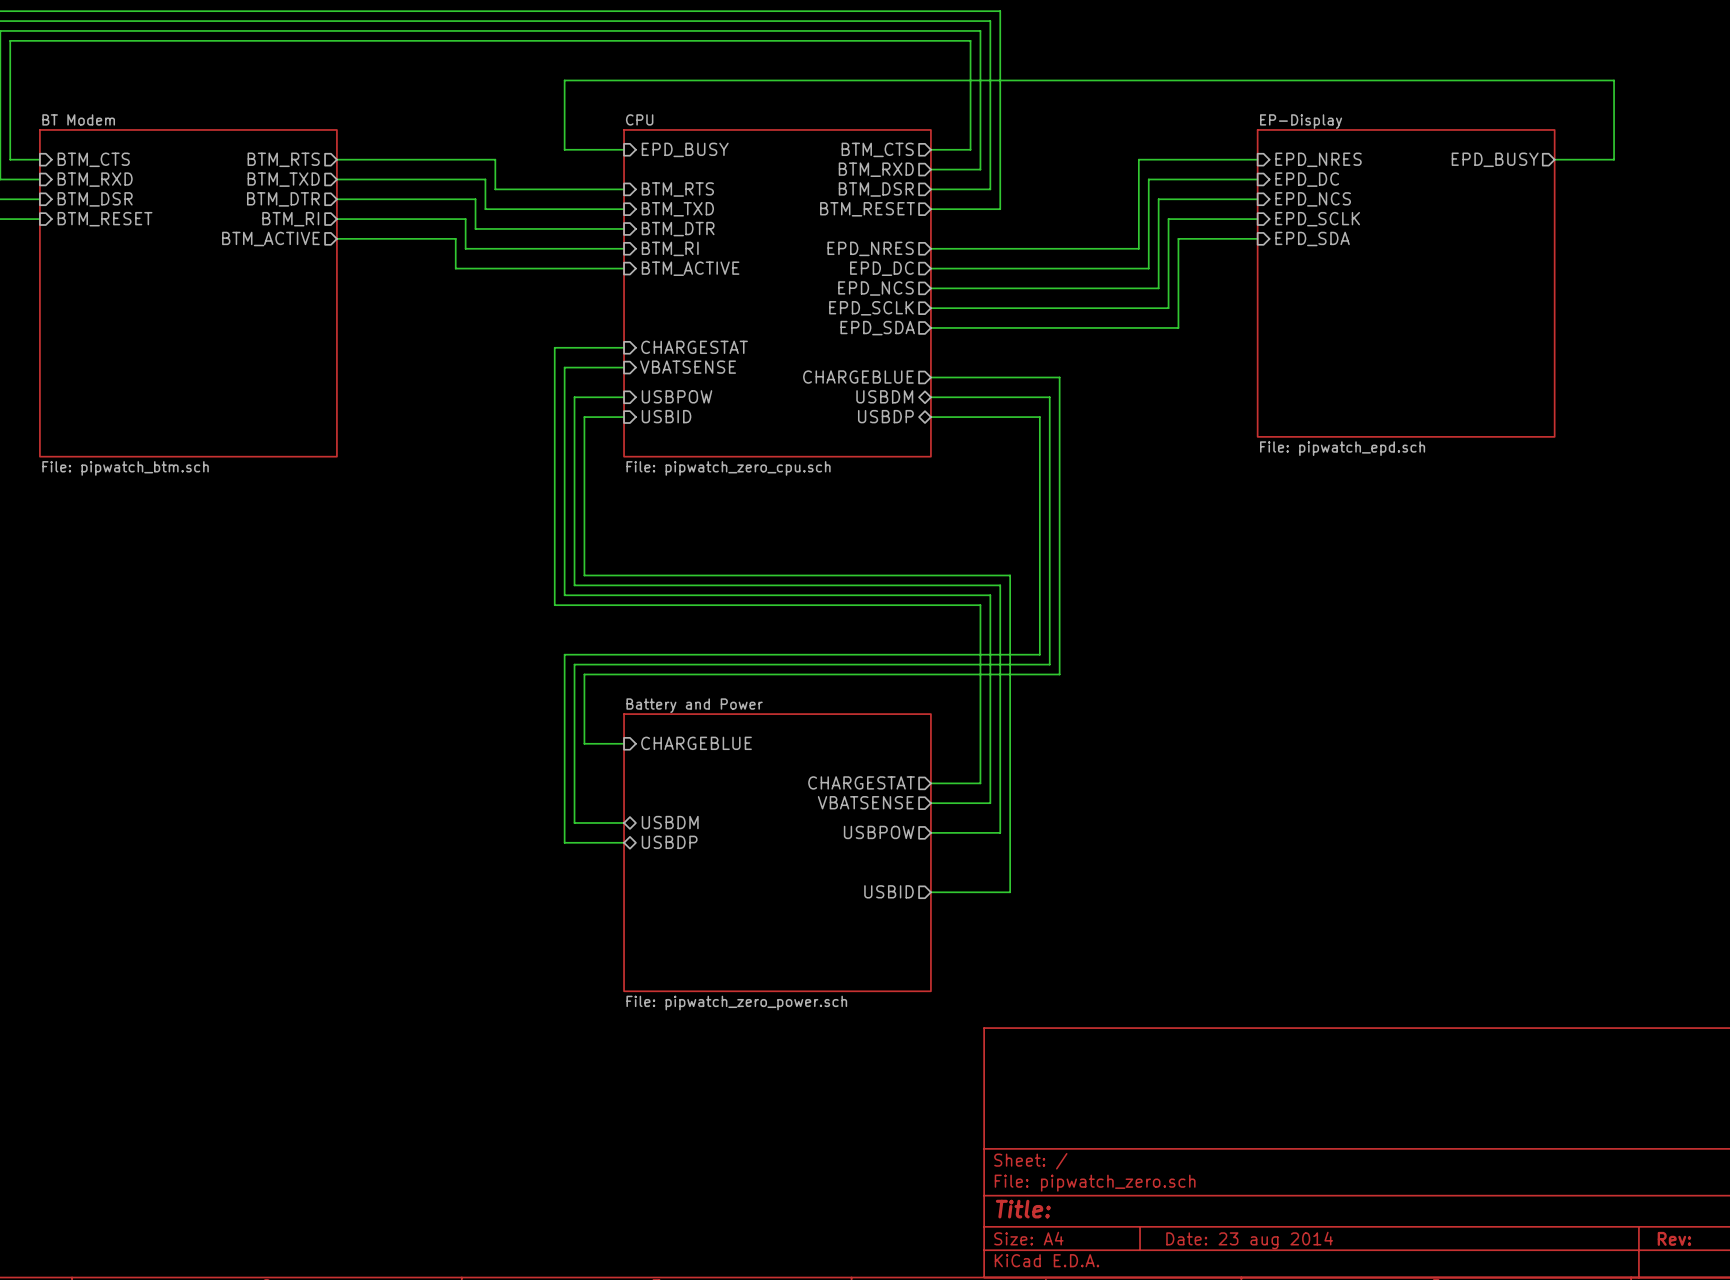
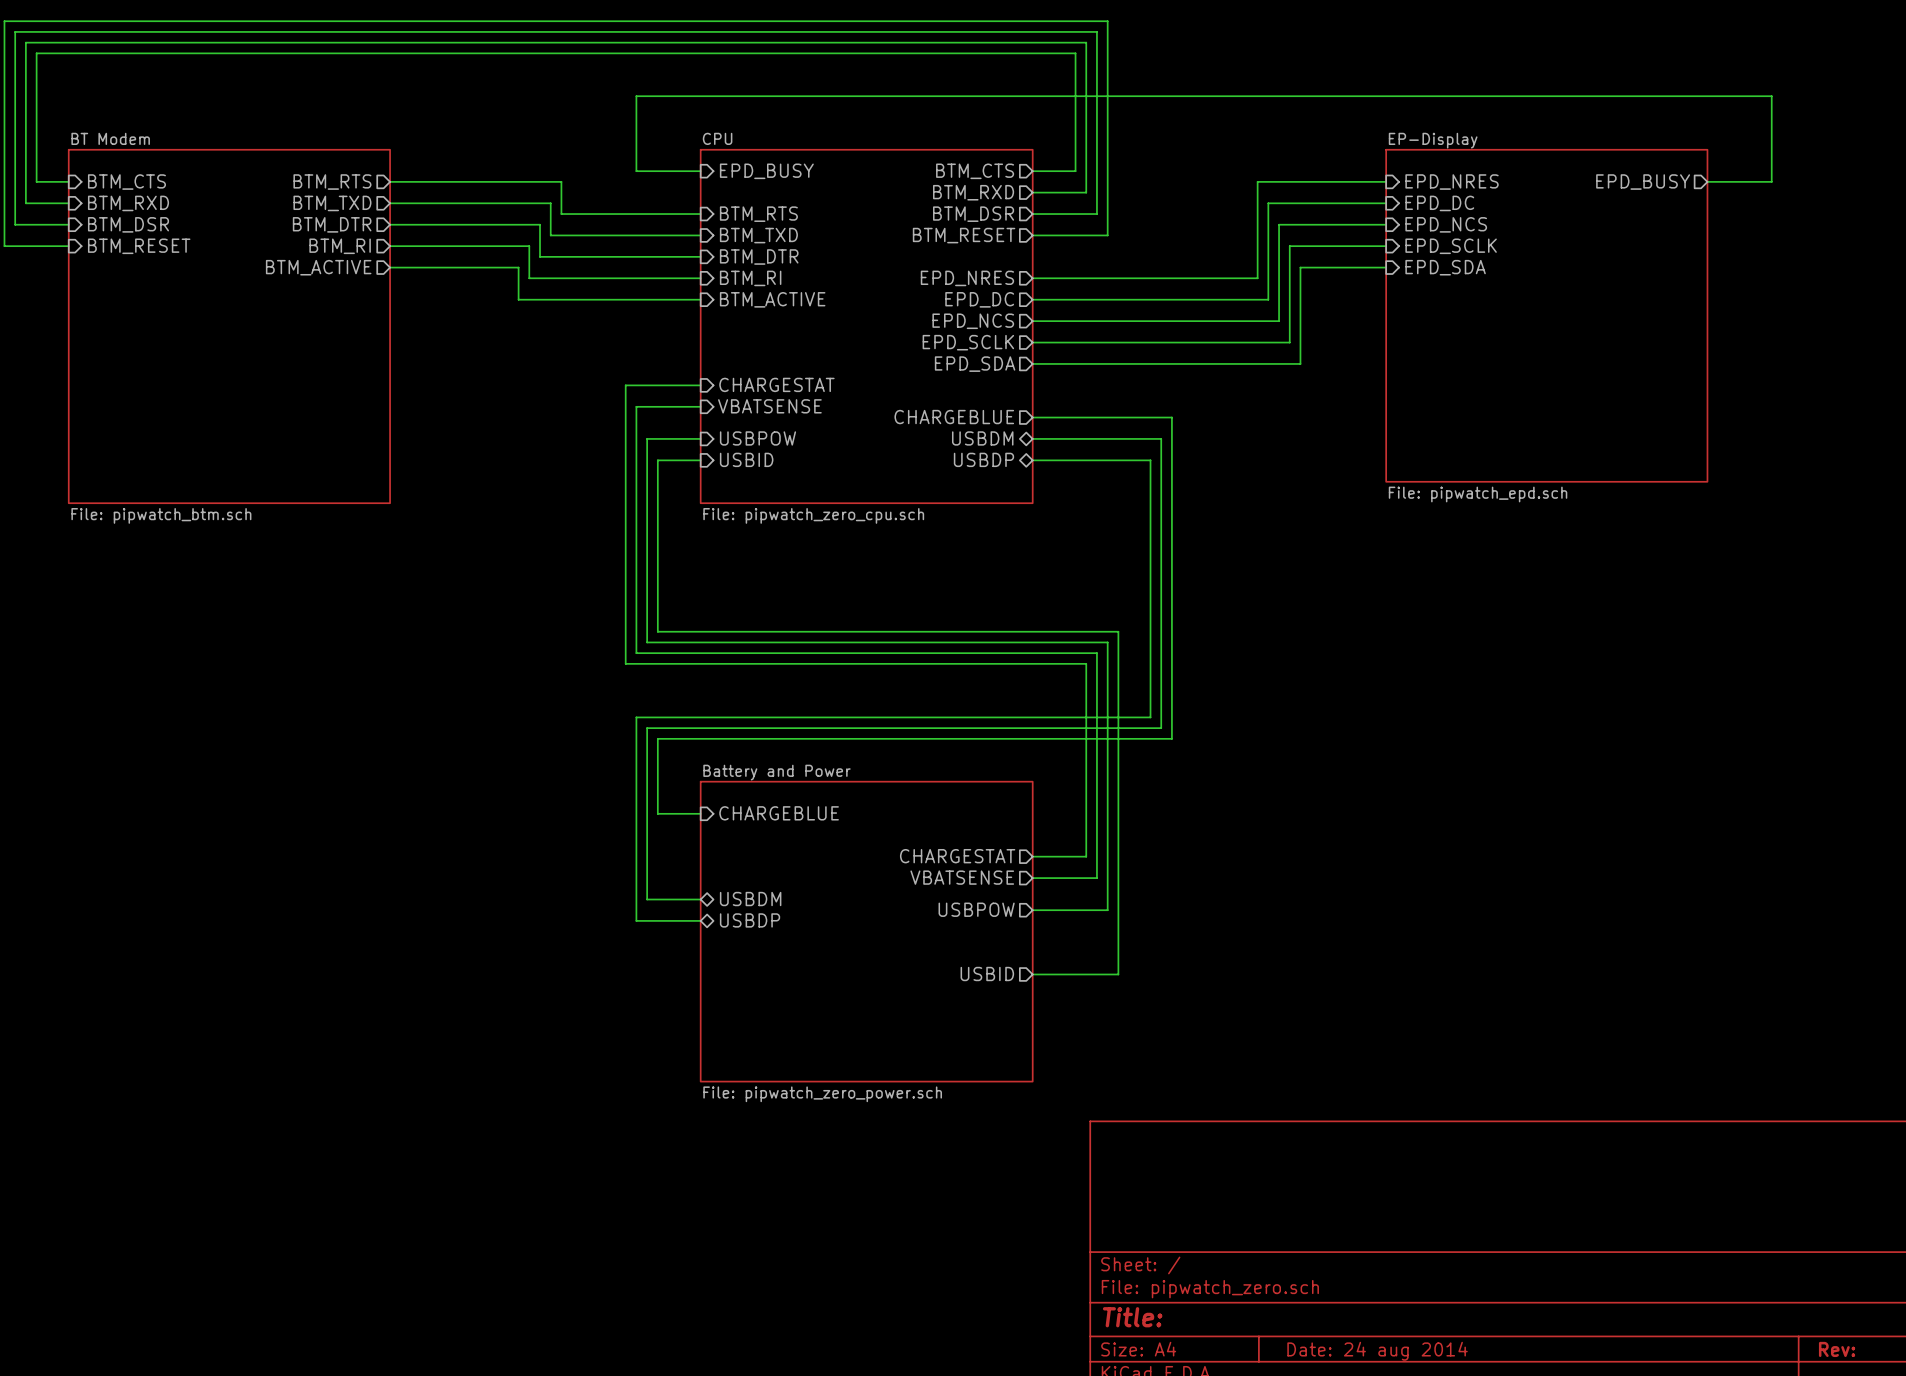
title block: Date: 23 aug 2014 (1249, 1240) -> Date: 24 aug 2014 (1377, 1351)

